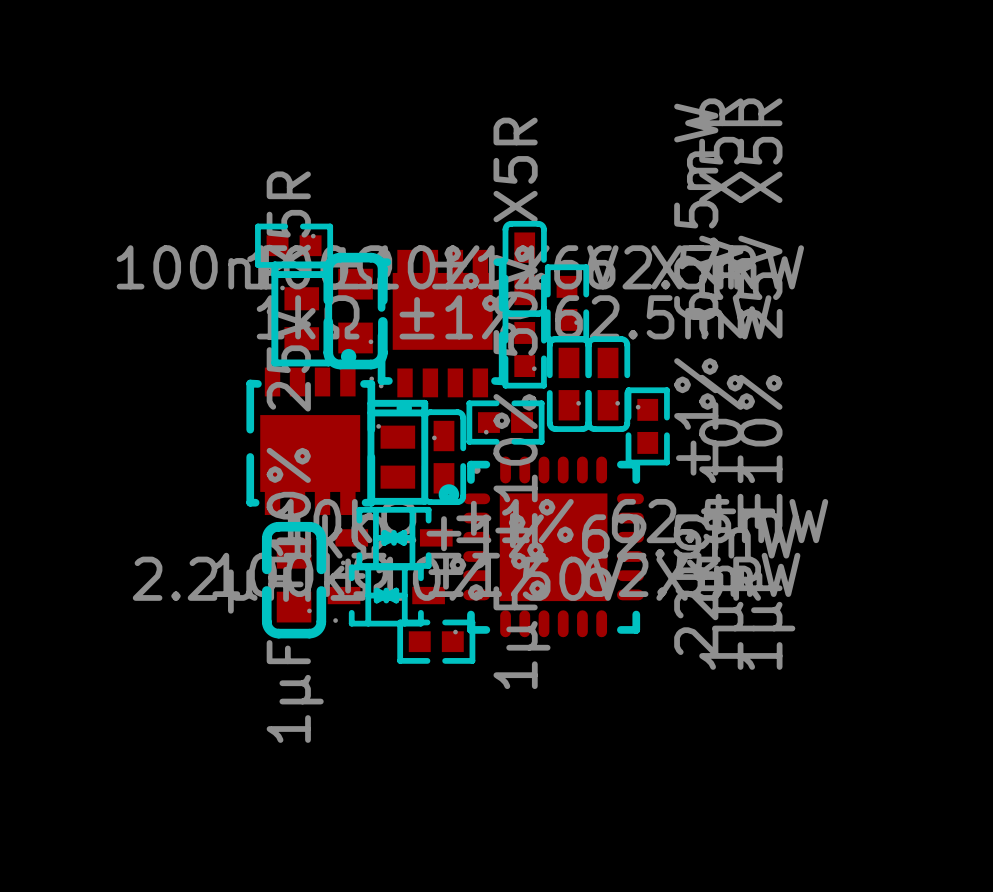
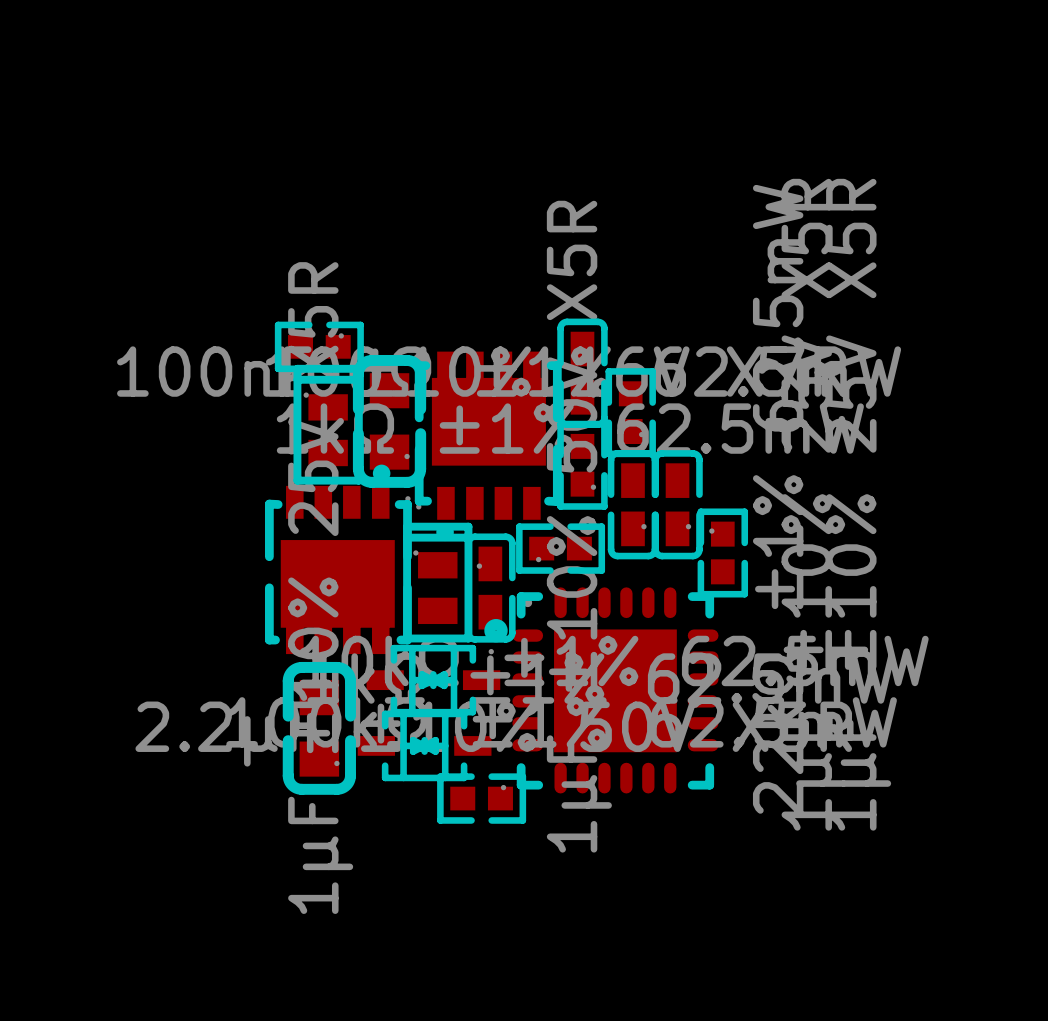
part rotation: 0° (394, 537) -> 180° (433, 680)
part rotation: 0° (386, 595) -> 180° (424, 745)

